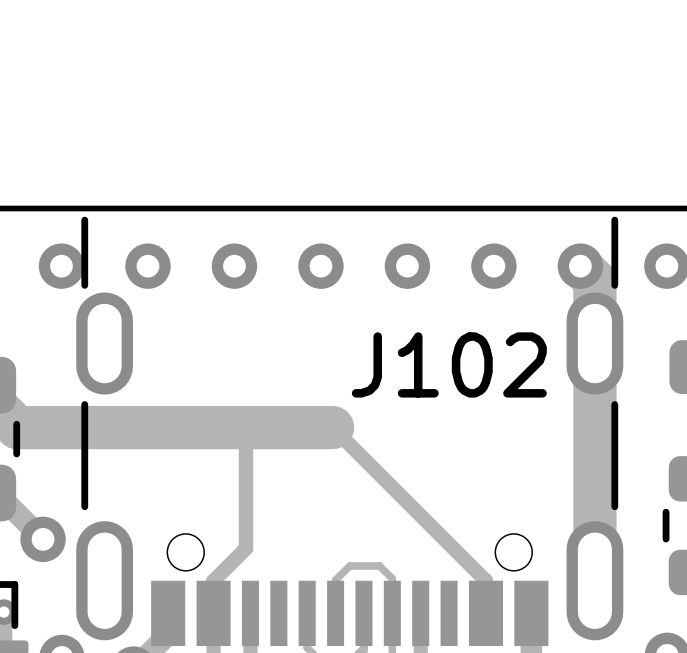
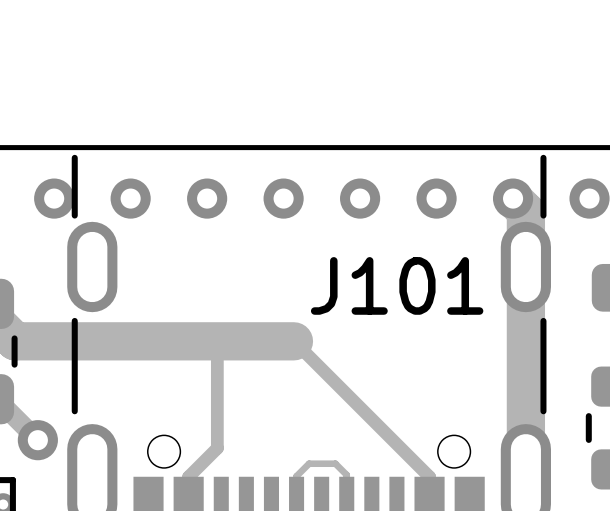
J102 name: J102 (449, 364) -> J101 (397, 285)

